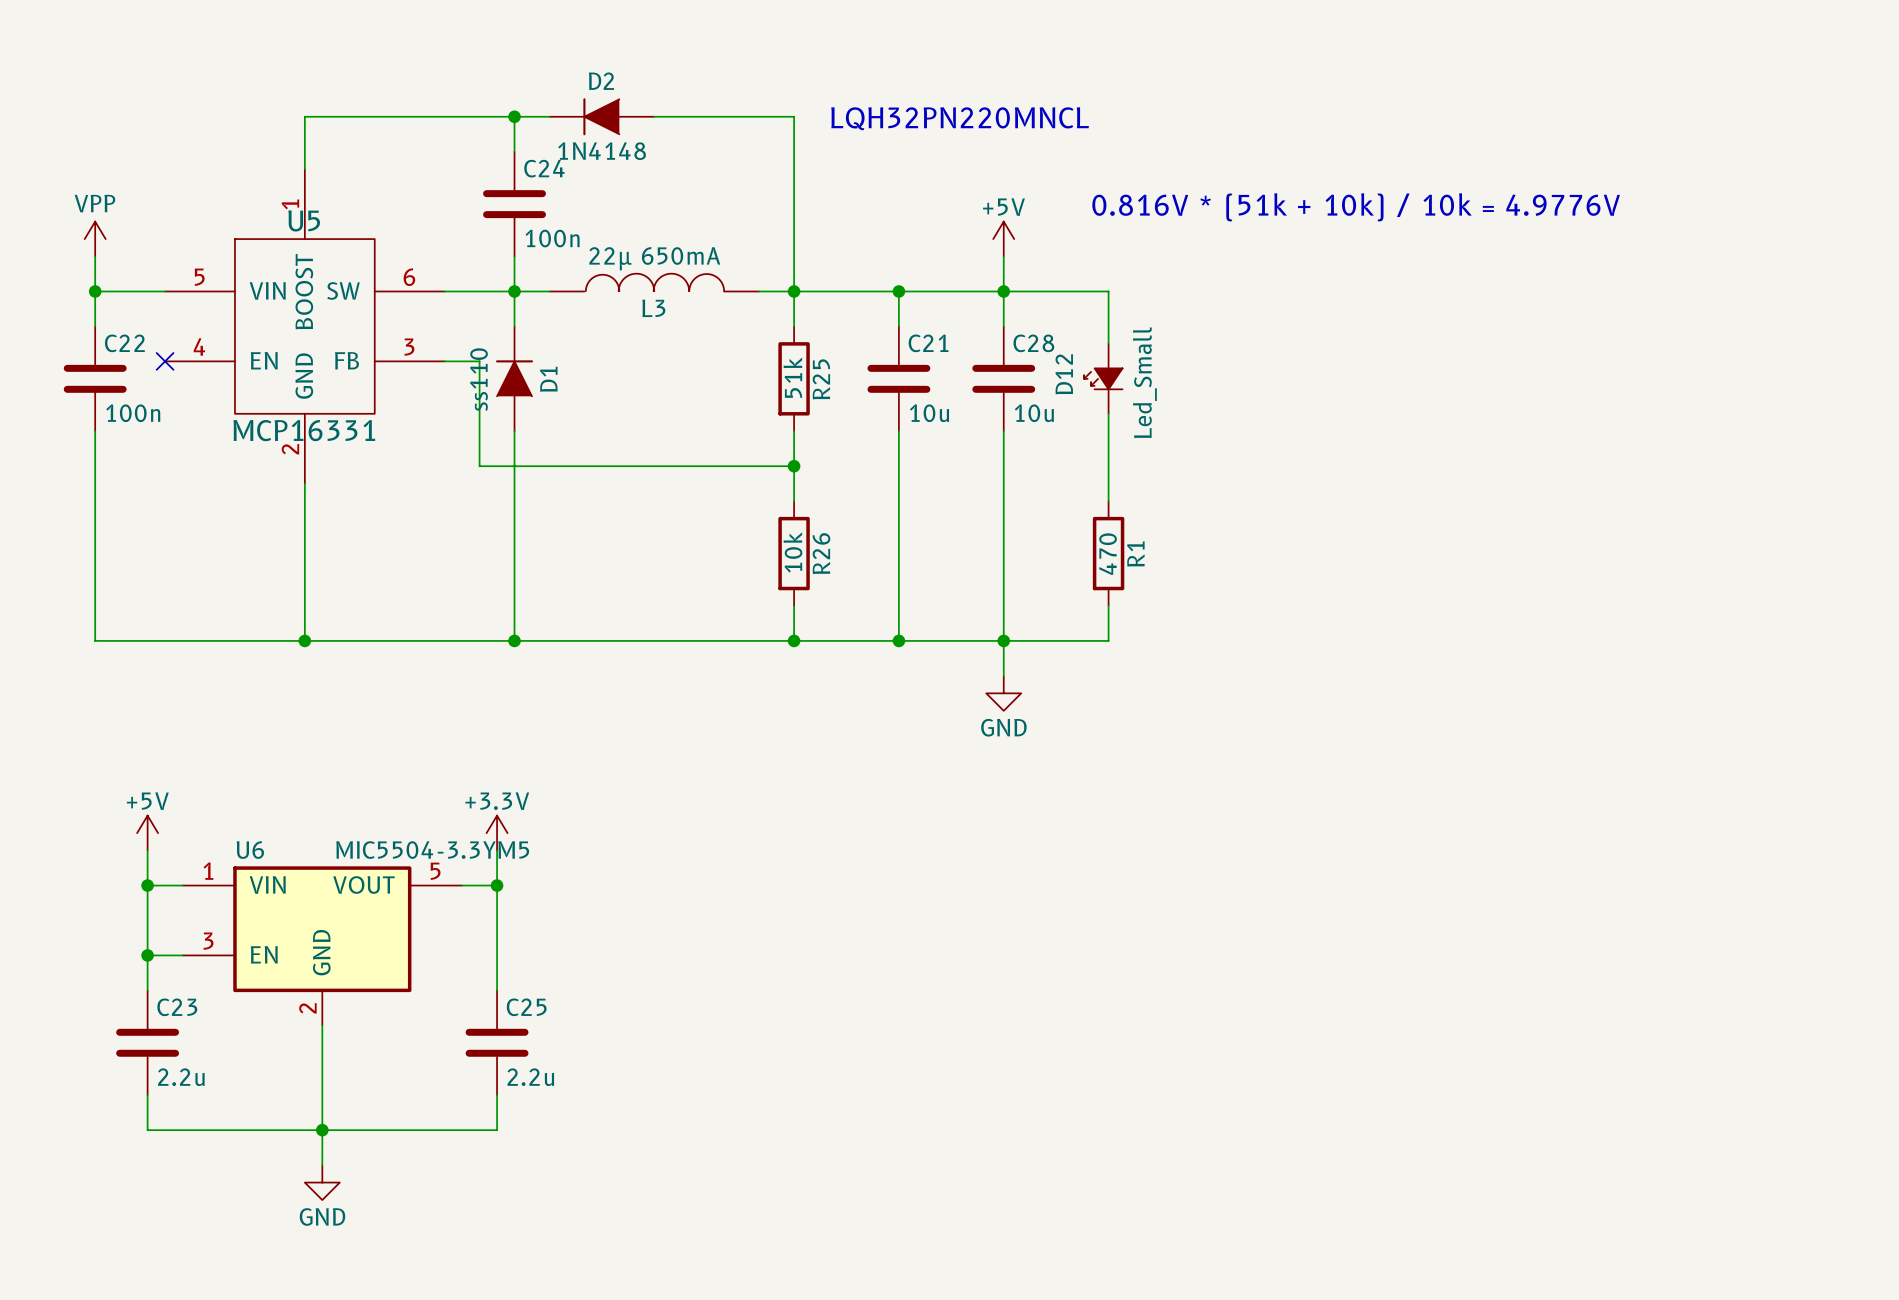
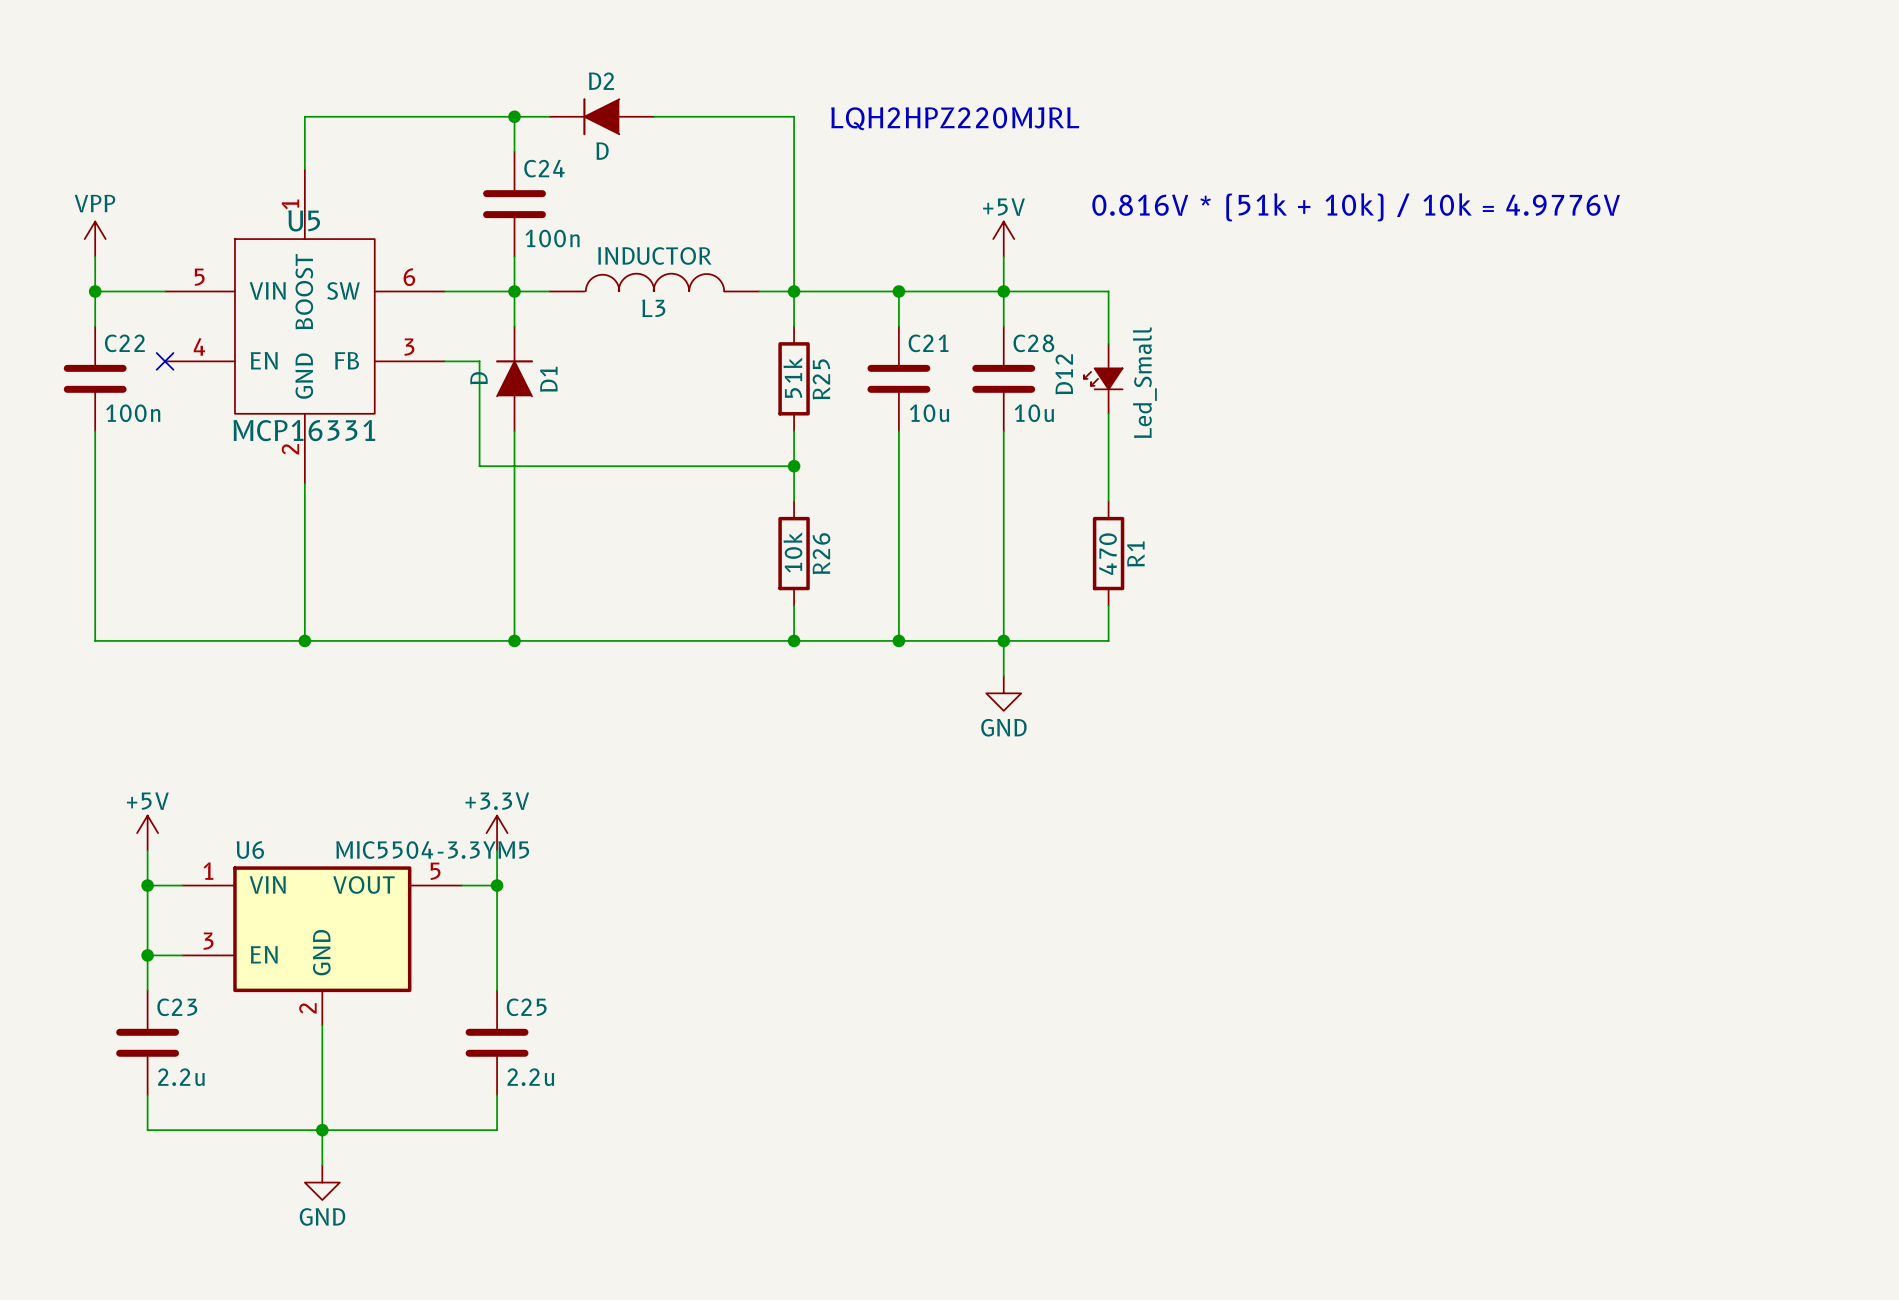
text: LQH32PN220MNCL (960, 118) -> LQH2HPZ220MJRL (955, 118)
D2 value: 1N4148 (602, 151) -> D (602, 151)
L3 value: 22µ 650mA (654, 258) -> INDUCTOR (654, 255)
D1 value: ss110 (479, 379) -> D (478, 378)

